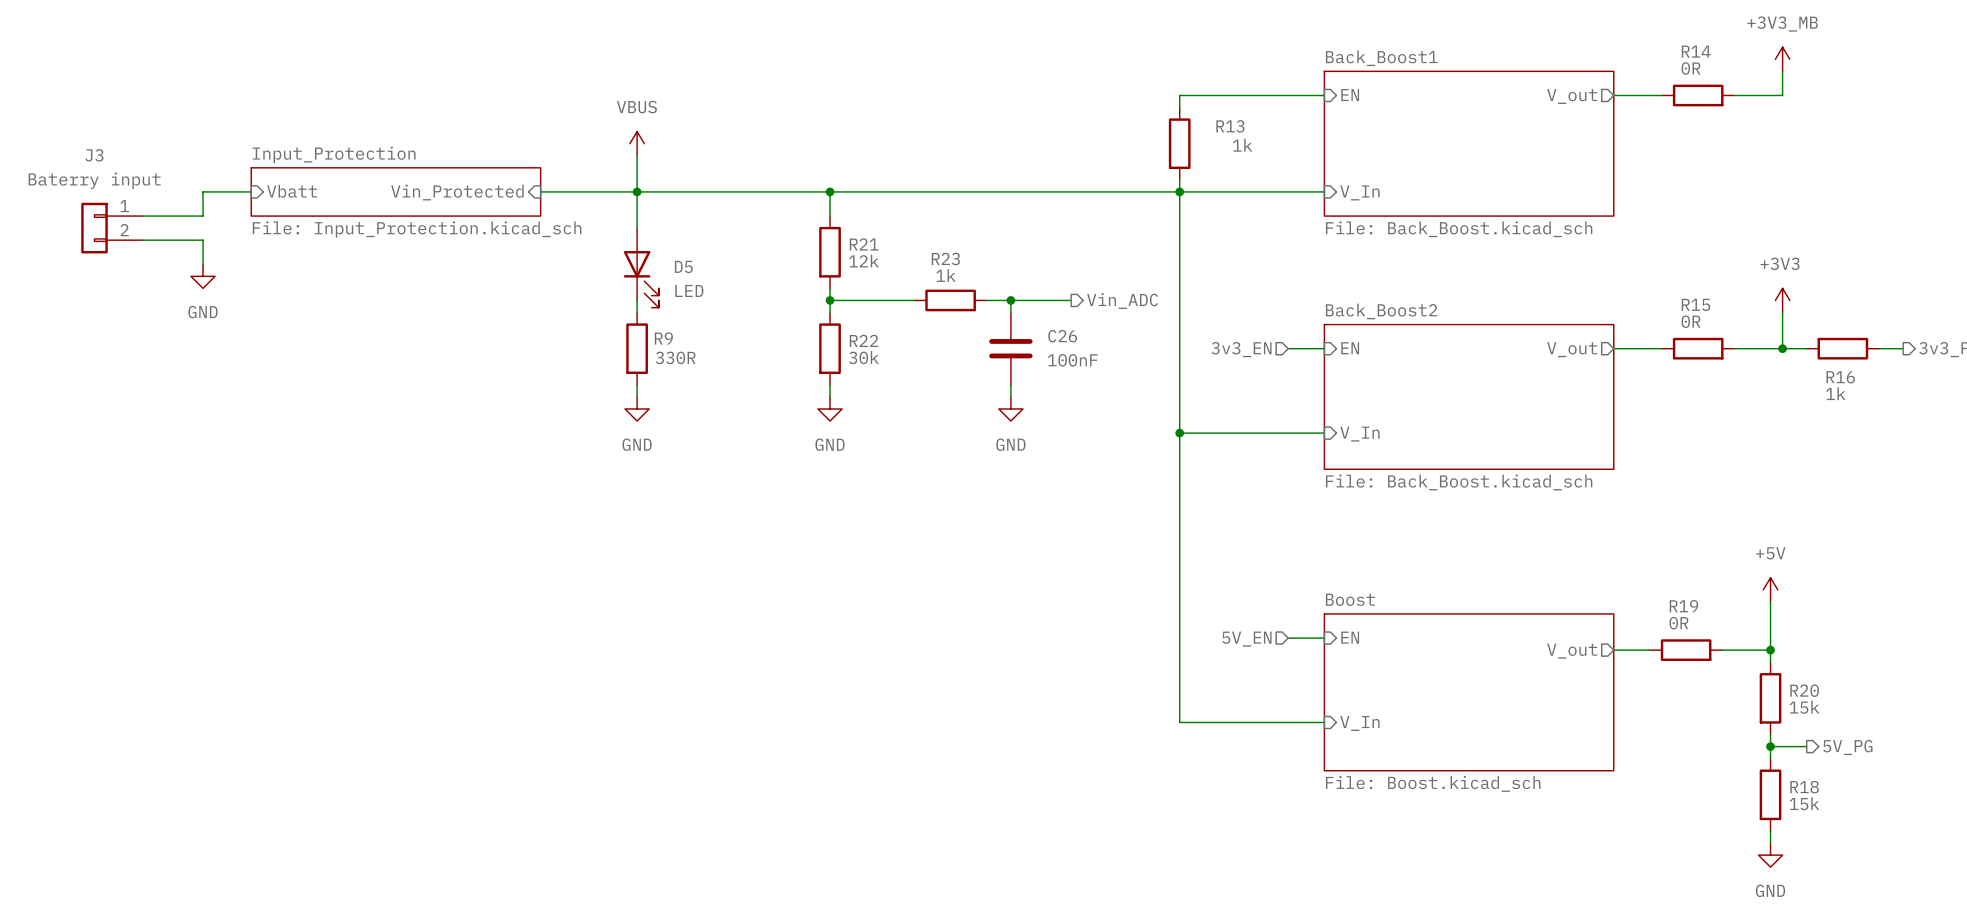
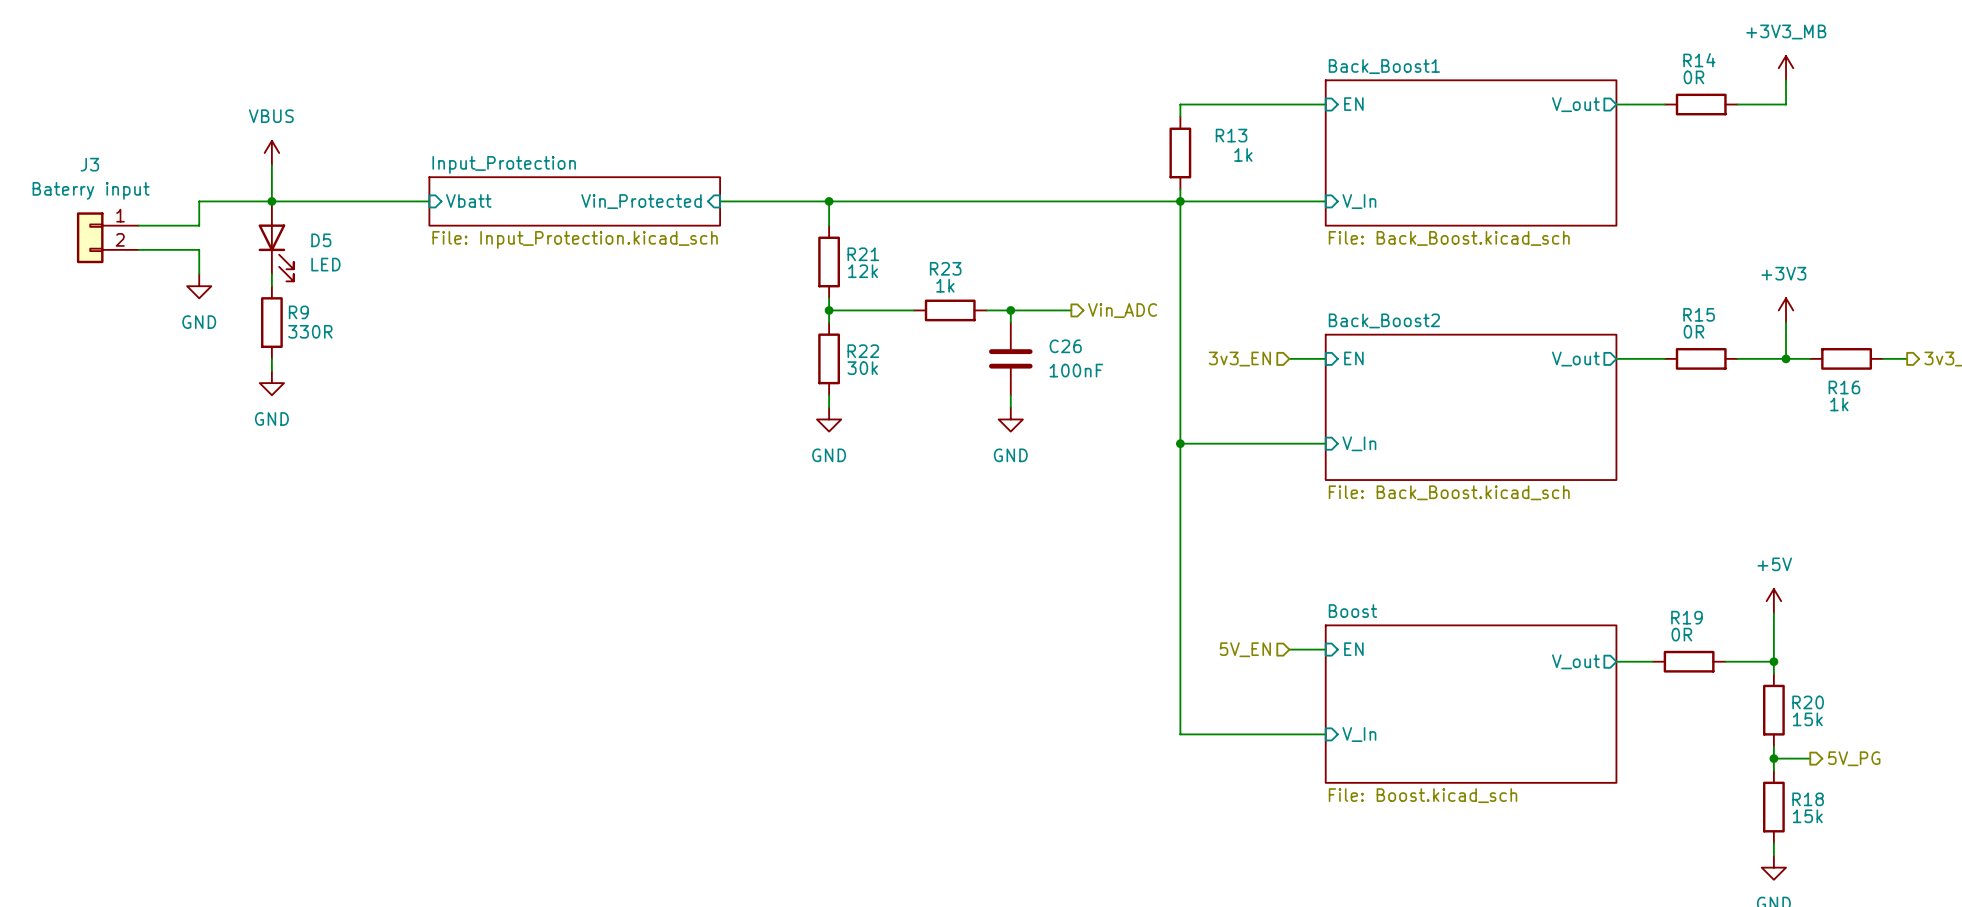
power symbol: none -> VBUS (271, 152)
power symbol: VBUS (637, 143) -> none
wire: none -> (271, 165) (271, 201)
wire: (637, 155) (637, 228) -> none
wire: none -> (247, 201) (429, 201)
junction: none -> (271, 201)
sheet pin position: Vbatt (292, 191) -> Vbatt (468, 200)
sheet Input_Protection position: (395, 191) -> (574, 201)
wire: (540, 191) (721, 191) -> none
junction: (637, 191) -> none
sheet pin position: Vin_Protected (457, 192) -> Vin_Protected (641, 201)
wire: none -> (271, 274) (271, 286)
D5 position: (641, 267) -> (276, 241)
wire: (637, 300) (637, 312) -> none
wire: none -> (271, 358) (271, 371)
R9 position: (637, 348) -> (271, 322)
power symbol: none -> GND (271, 383)
wire: (637, 384) (637, 396) -> none
power symbol: GND (637, 408) -> none

